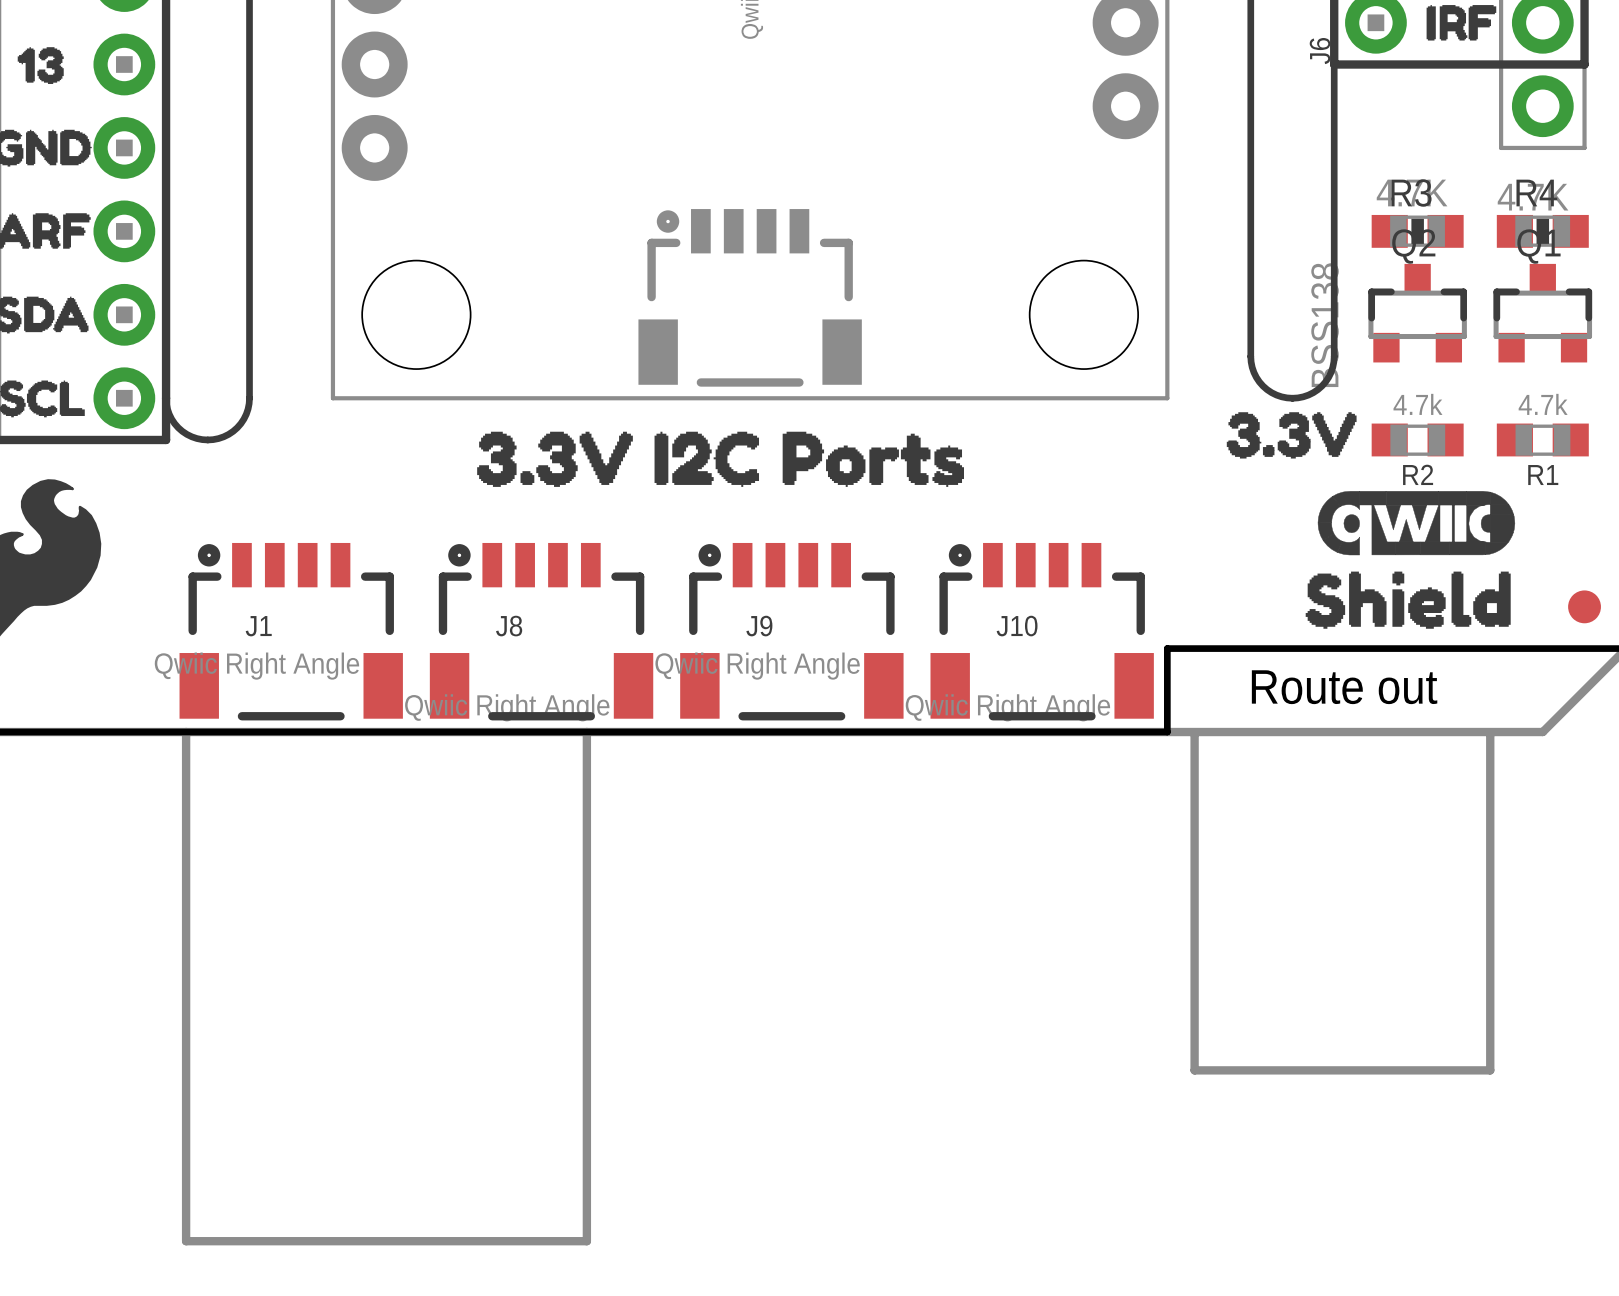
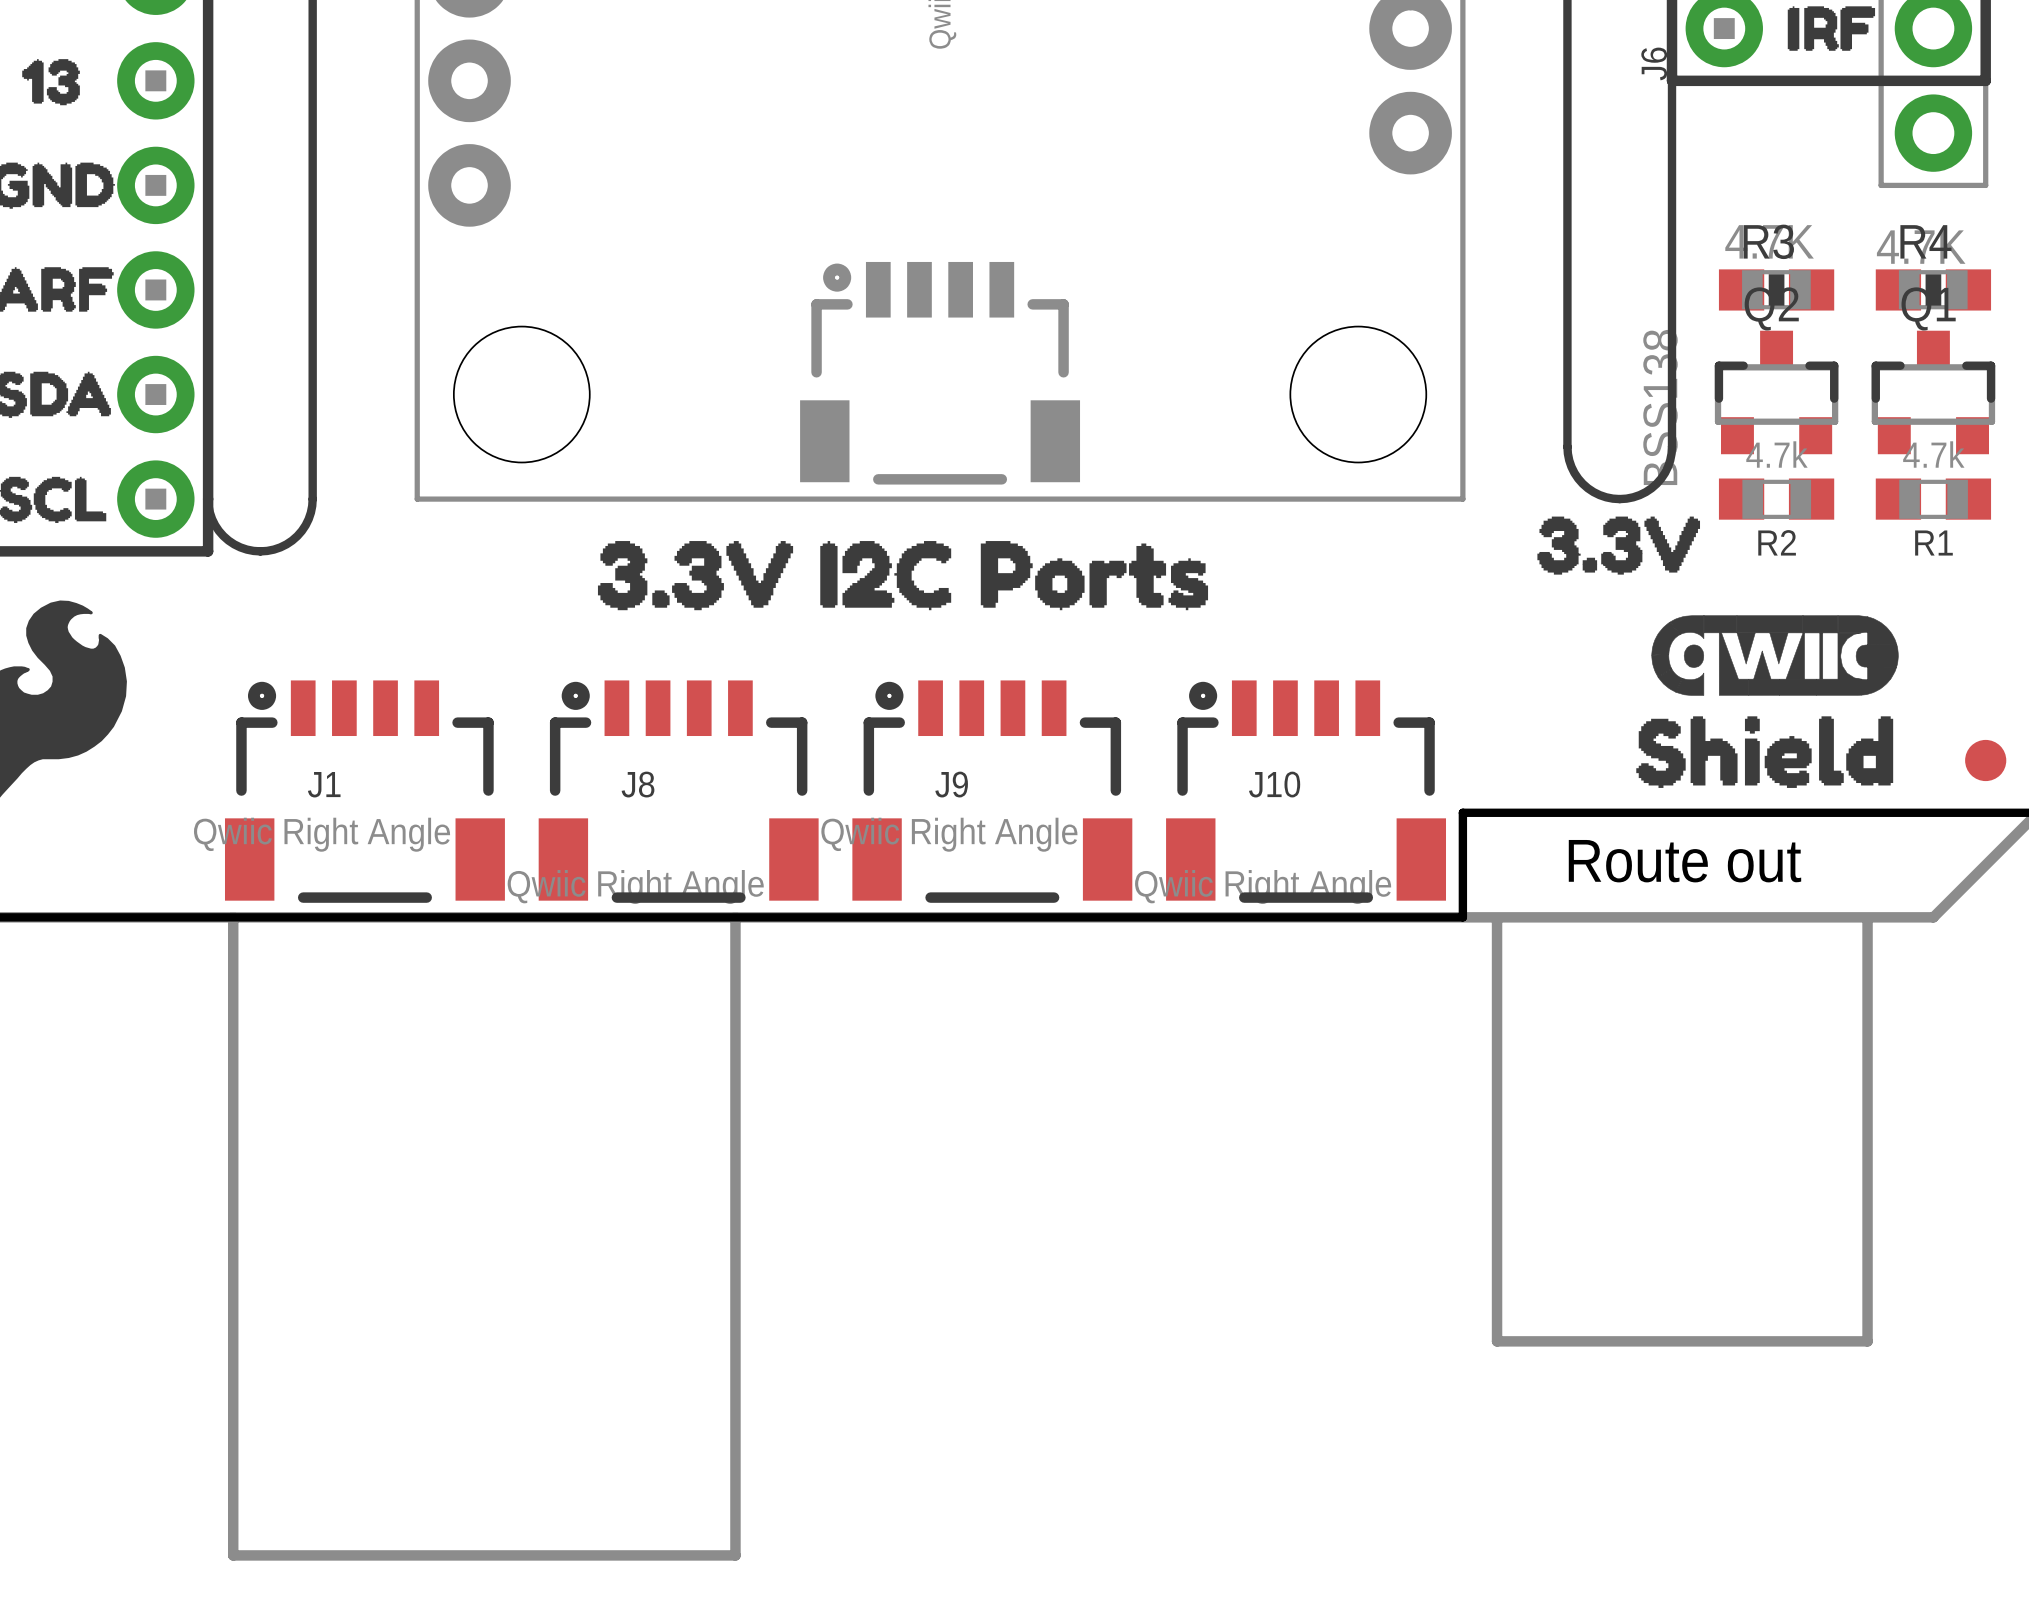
R2 position: (1417, 439) -> (1776, 499)
R1 position: (1542, 439) -> (1933, 499)

